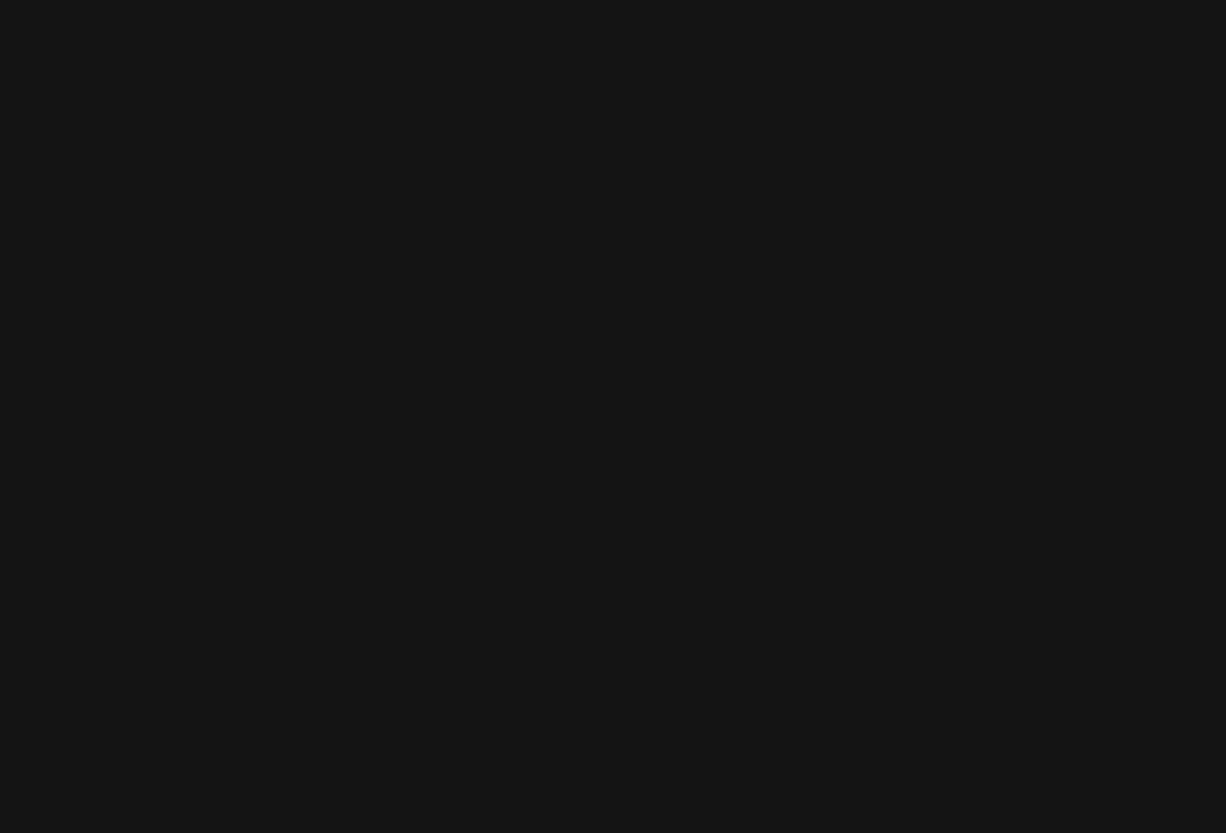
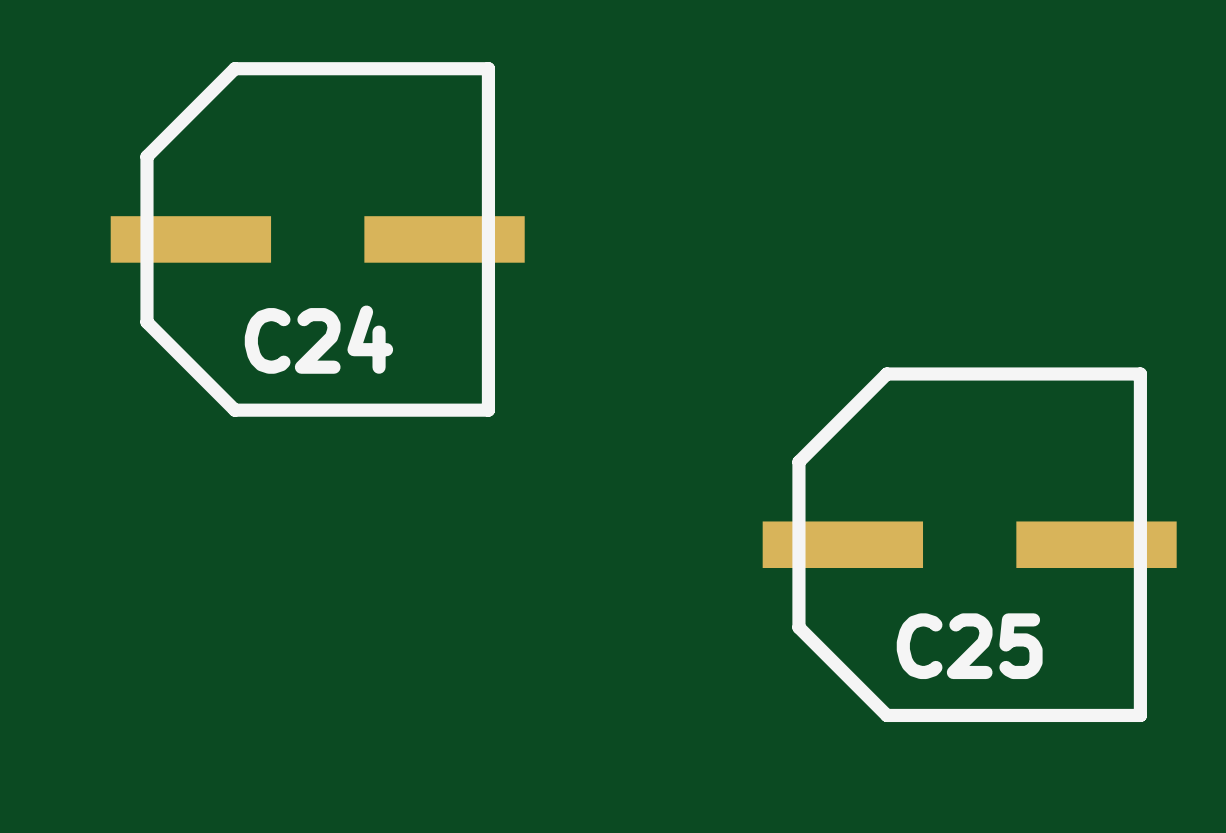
C24: none -> (317, 239)
C25: none -> (969, 544)

